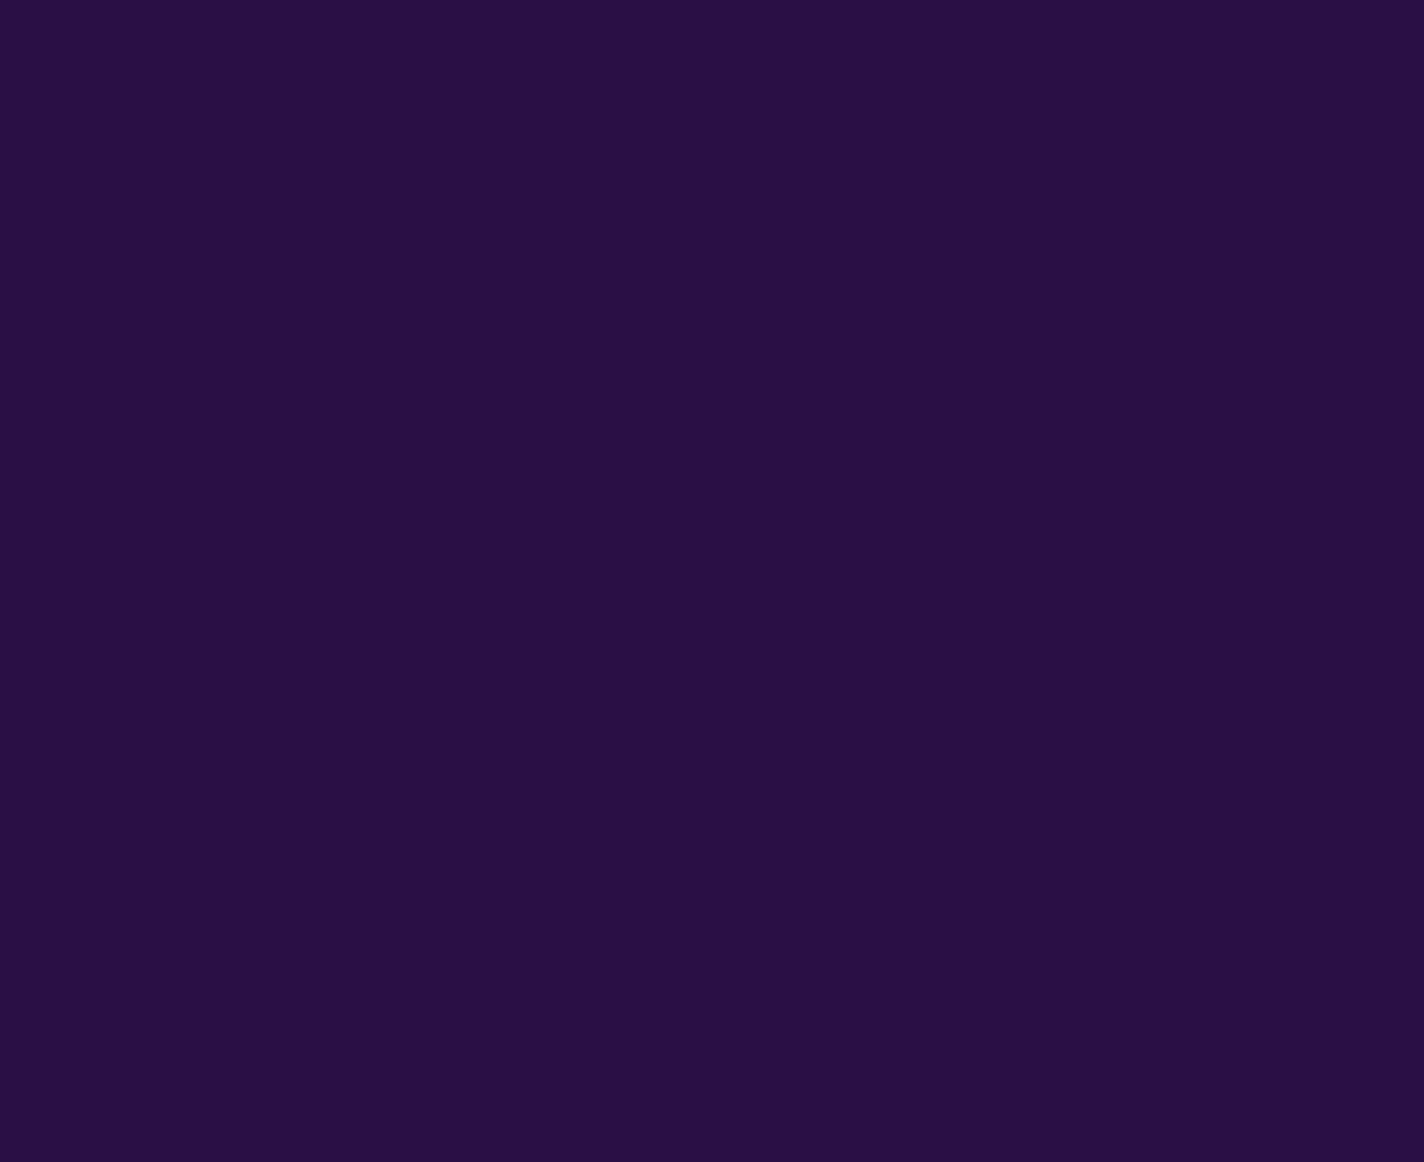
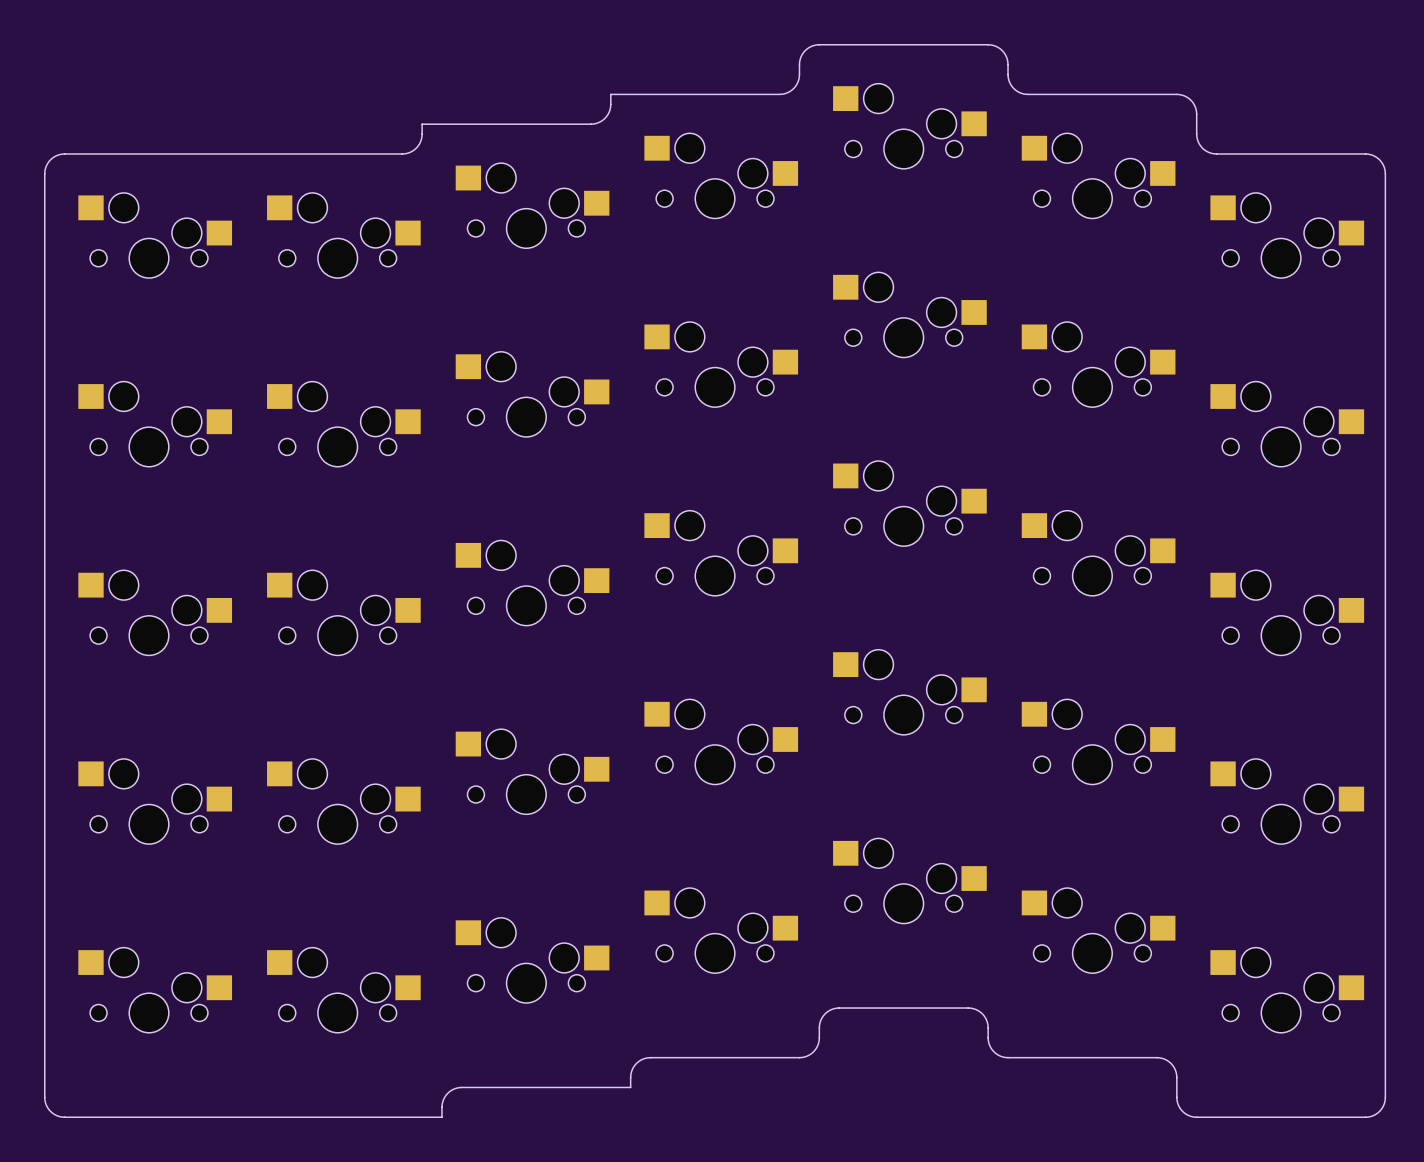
board edge: none -> (988, 44) (816, 44) (809, 47) (802, 54) (797, 82) (793, 88) (784, 93) (610, 94) (608, 114) (600, 121) (593, 124) (422, 124) (419, 144) (412, 151) (404, 153) (64, 153) (57, 155) (50, 159) (46, 166) (44, 173) (44, 1097) (46, 1104) (50, 1111) (57, 1115) (64, 1117) (441, 1117) (444, 1097) (449, 1091) (459, 1087) (630, 1087) (633, 1067) (638, 1061) (647, 1057) (804, 1056) (813, 1051) (817, 1045) (819, 1025) (823, 1015) (829, 1010) (839, 1008) (973, 1008) (982, 1013) (986, 1020) (990, 1047) (995, 1053) (1005, 1057) (1162, 1058) (1171, 1063) (1175, 1069) (1177, 1099) (1179, 1107) (1184, 1113) (1194, 1117) (1365, 1117) (1373, 1115) (1379, 1111) (1383, 1104) (1385, 1097) (1383, 166) (1377, 158) (1368, 154) (1211, 153) (1202, 148) (1198, 141) (1196, 109) (1190, 100) (1184, 95) (1022, 93) (1013, 88) (1009, 82) (1007, 62) (1003, 52) (998, 47) (988, 44)
part: none -> (909, 126)
part: none -> (721, 175)
part: none -> (1098, 175)
part: none -> (532, 205)
part: none -> (155, 235)
part: none -> (343, 235)
part: none -> (1287, 235)
part: none -> (909, 314)
part: none -> (721, 364)
part: none -> (1098, 364)
part: none -> (532, 394)
part: none -> (155, 424)
part: none -> (343, 424)
part: none -> (1287, 424)
part: none -> (909, 503)
part: none -> (721, 553)
part: none -> (1098, 553)
part: none -> (532, 583)
part: none -> (155, 612)
part: none -> (343, 612)
part: none -> (1287, 612)
part: none -> (909, 692)
part: none -> (721, 741)
part: none -> (1098, 741)
part: none -> (532, 771)
part: none -> (155, 801)
part: none -> (343, 801)
part: none -> (1287, 801)
part: none -> (909, 880)
part: none -> (721, 930)
part: none -> (1098, 930)
part: none -> (532, 960)
part: none -> (155, 990)
part: none -> (343, 990)
part: none -> (1287, 990)

